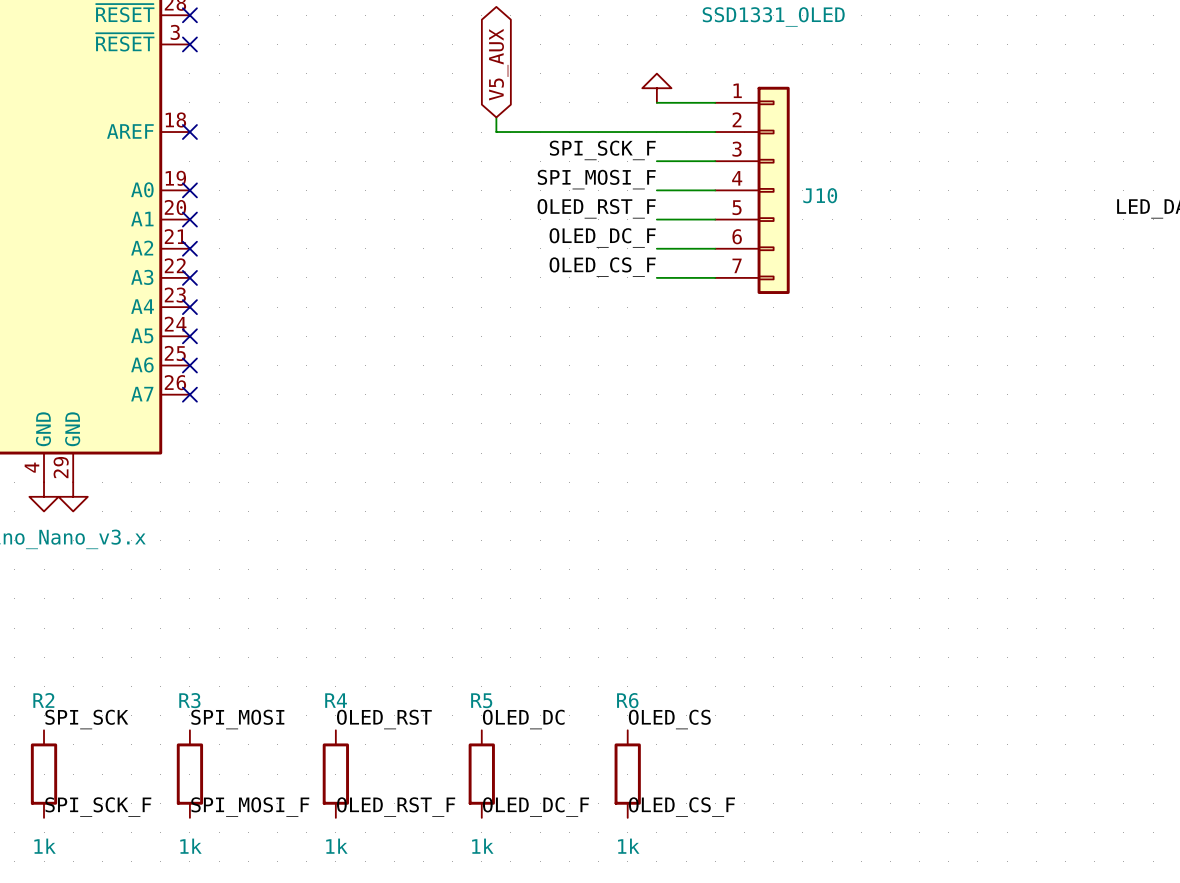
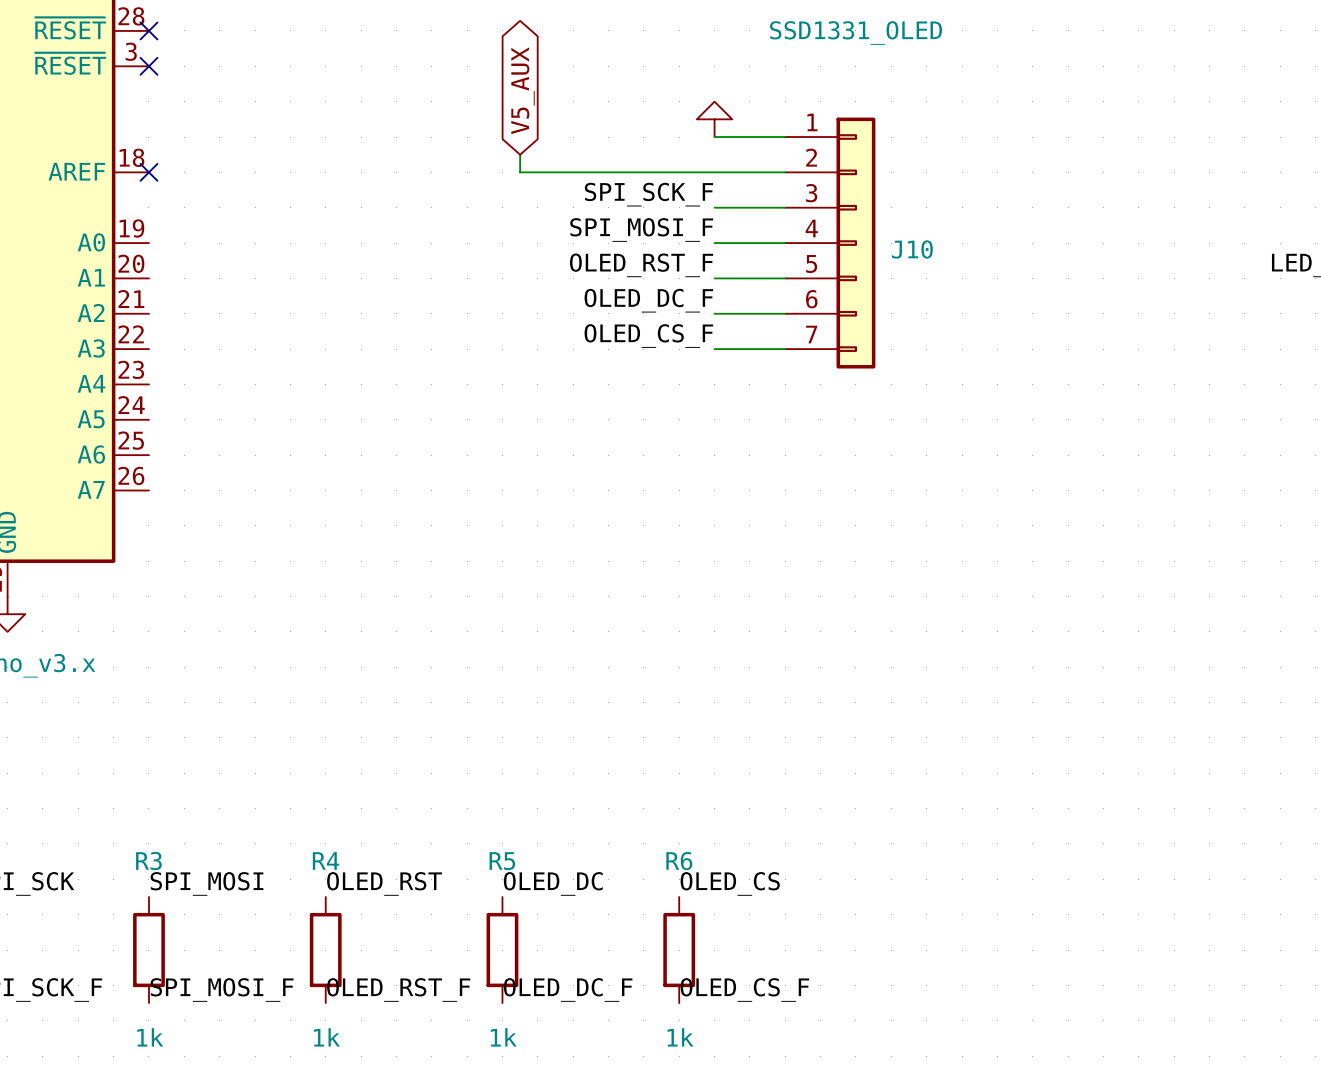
no-connect mark: (189, 190) -> none
no-connect mark: (189, 219) -> none
no-connect mark: (189, 248) -> none
no-connect mark: (189, 277) -> none
no-connect mark: (189, 307) -> none
no-connect mark: (189, 336) -> none
no-connect mark: (189, 365) -> none
no-connect mark: (189, 394) -> none

